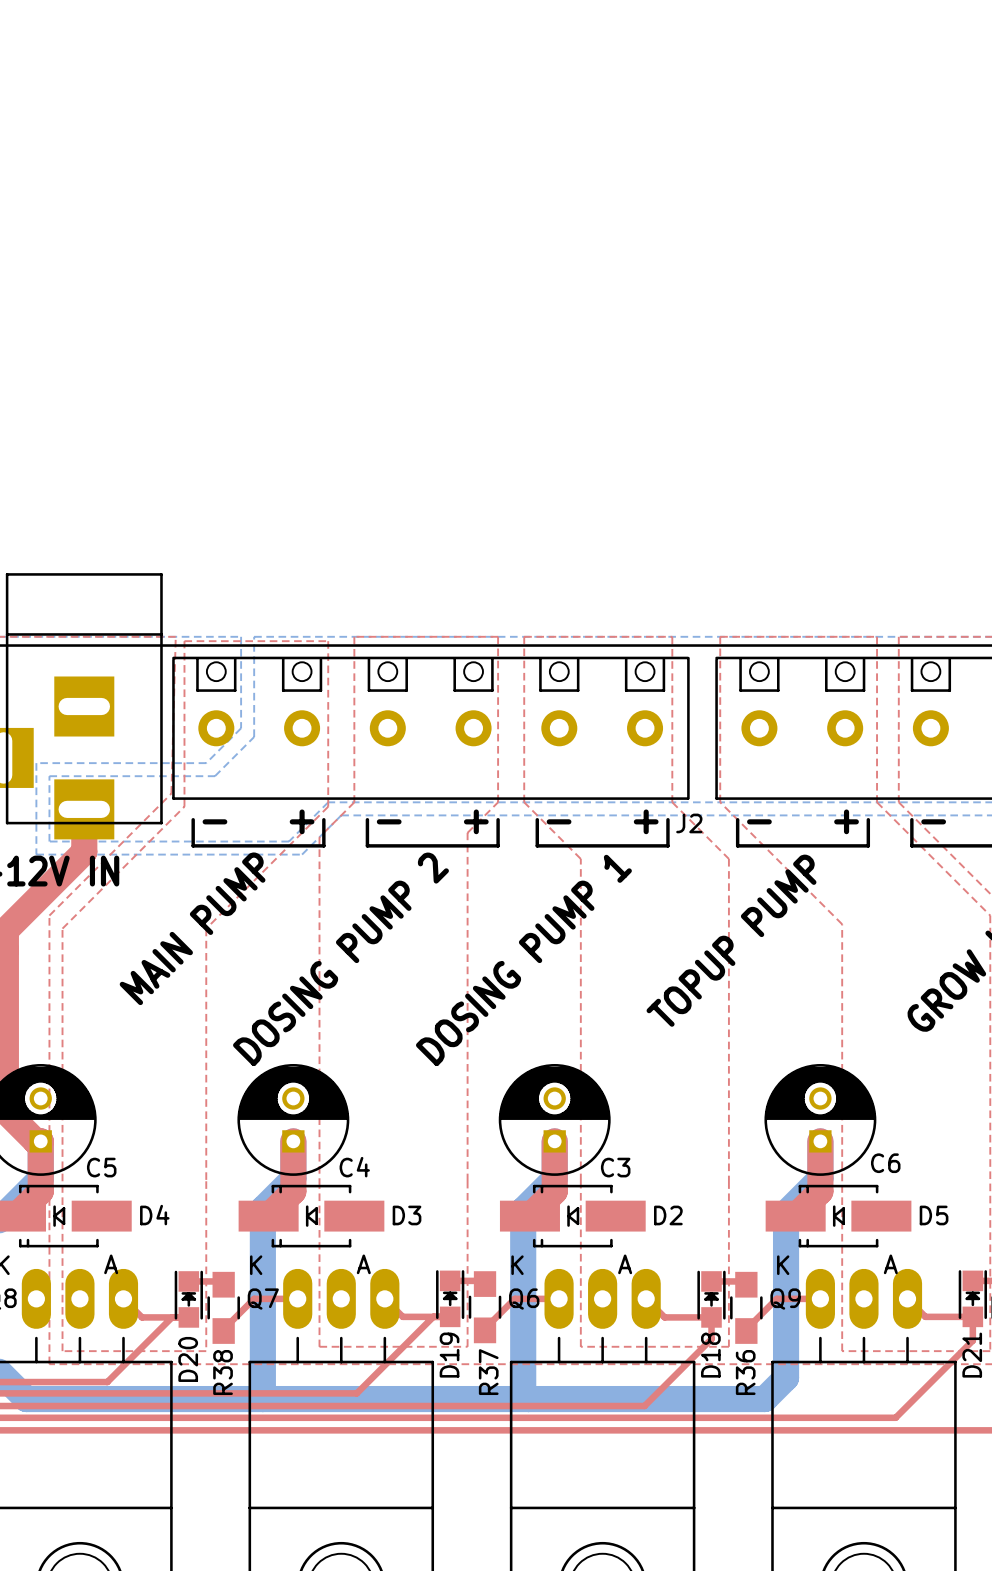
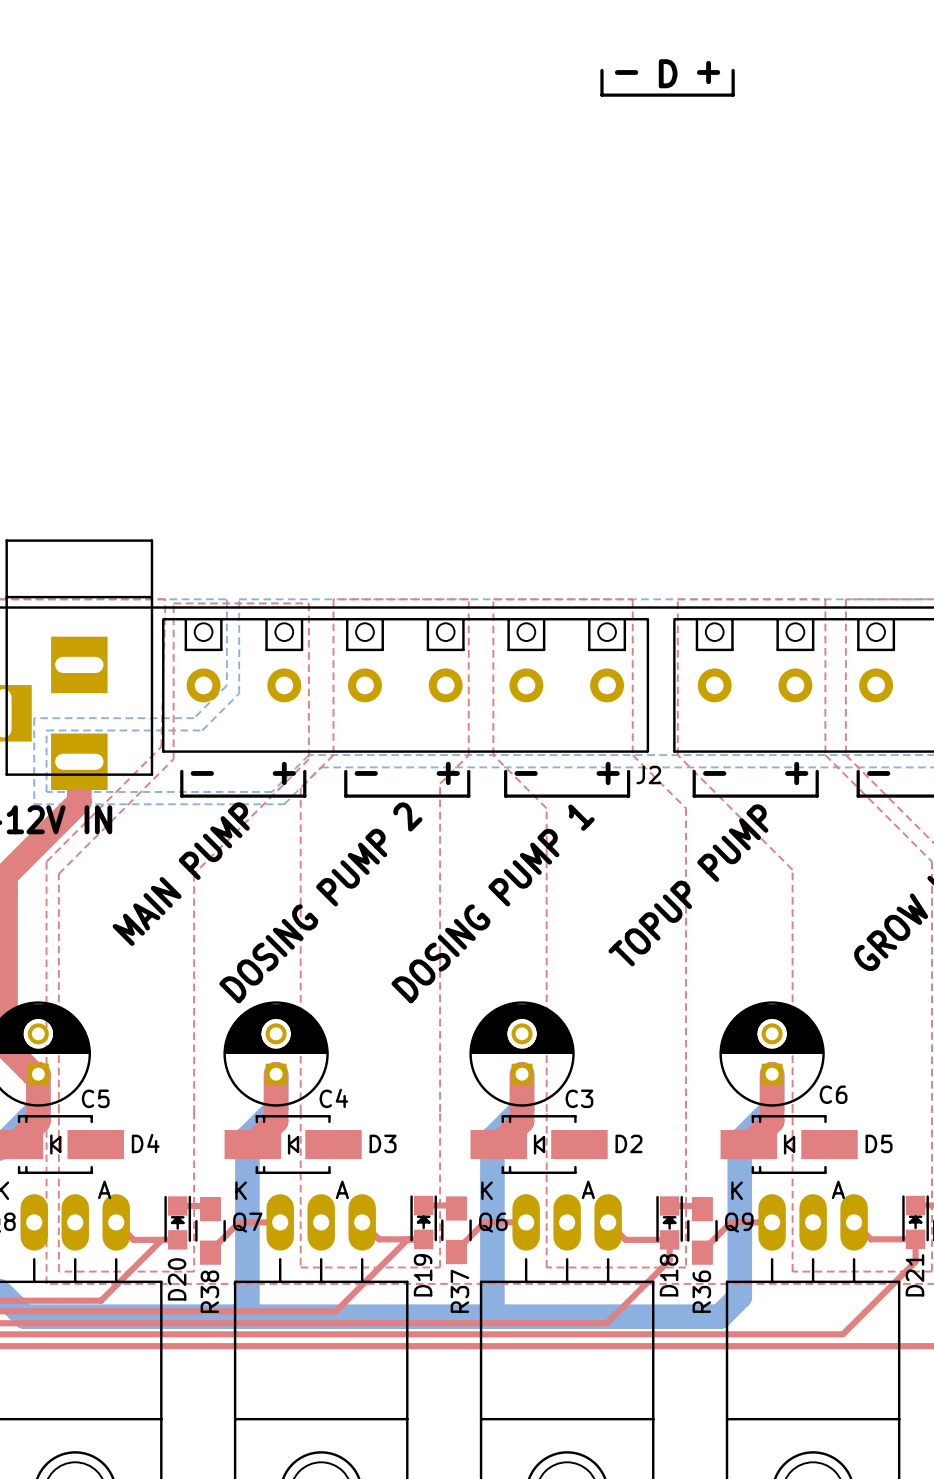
line: none -> (601, 70) (601, 95) (733, 95) (733, 70)
text: none -> - (626, 72)
text: none -> + (708, 72)
text: none -> D (668, 73)

